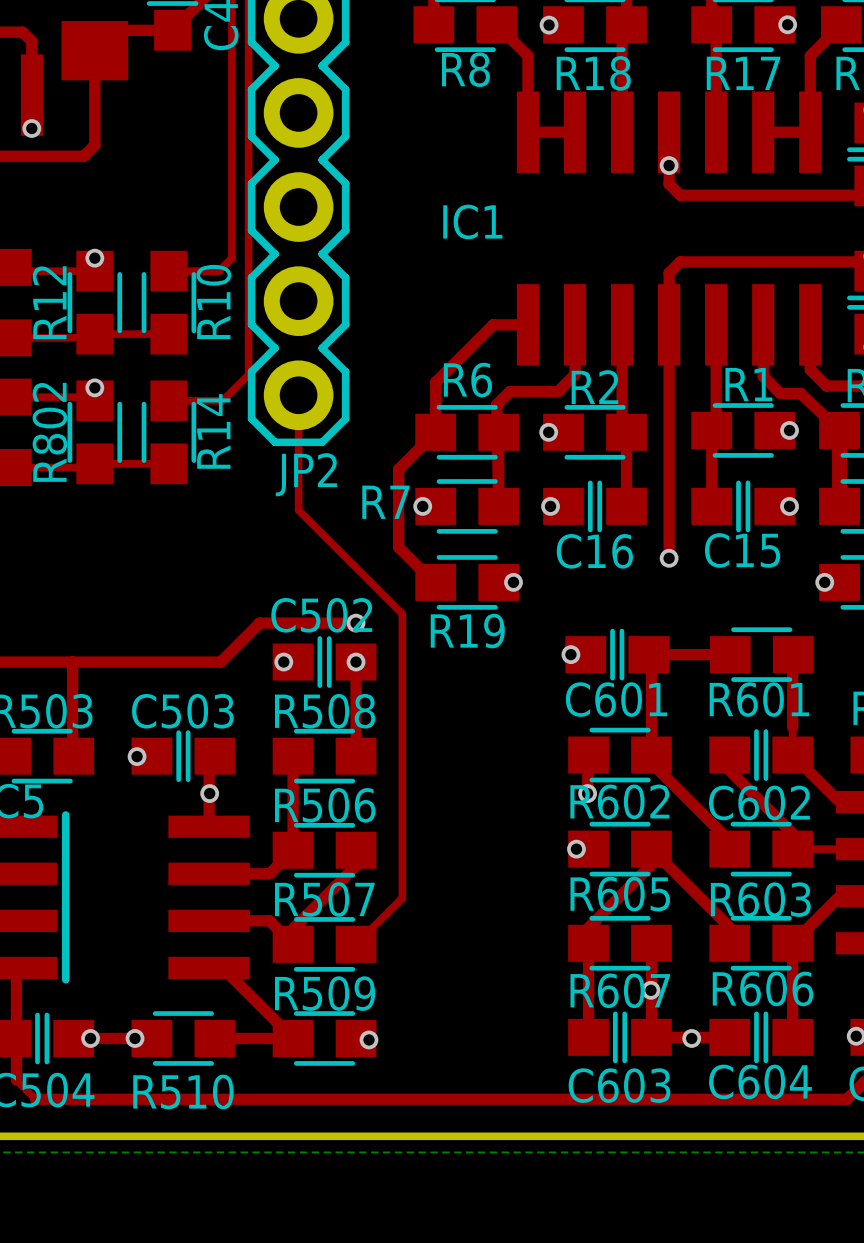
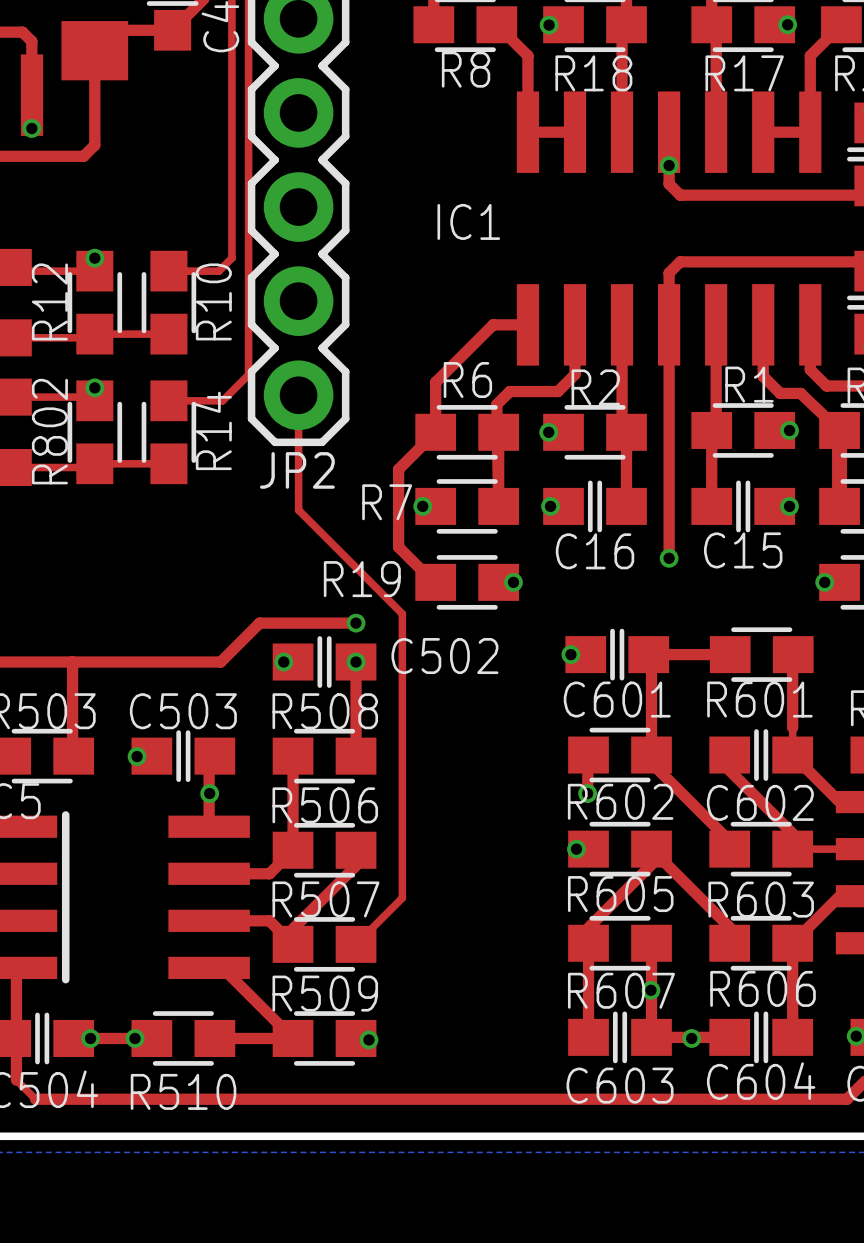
C502 name position: C502 (321, 615) -> C502 (444, 656)
R19 name position: R19 (467, 631) -> R19 (362, 579)

